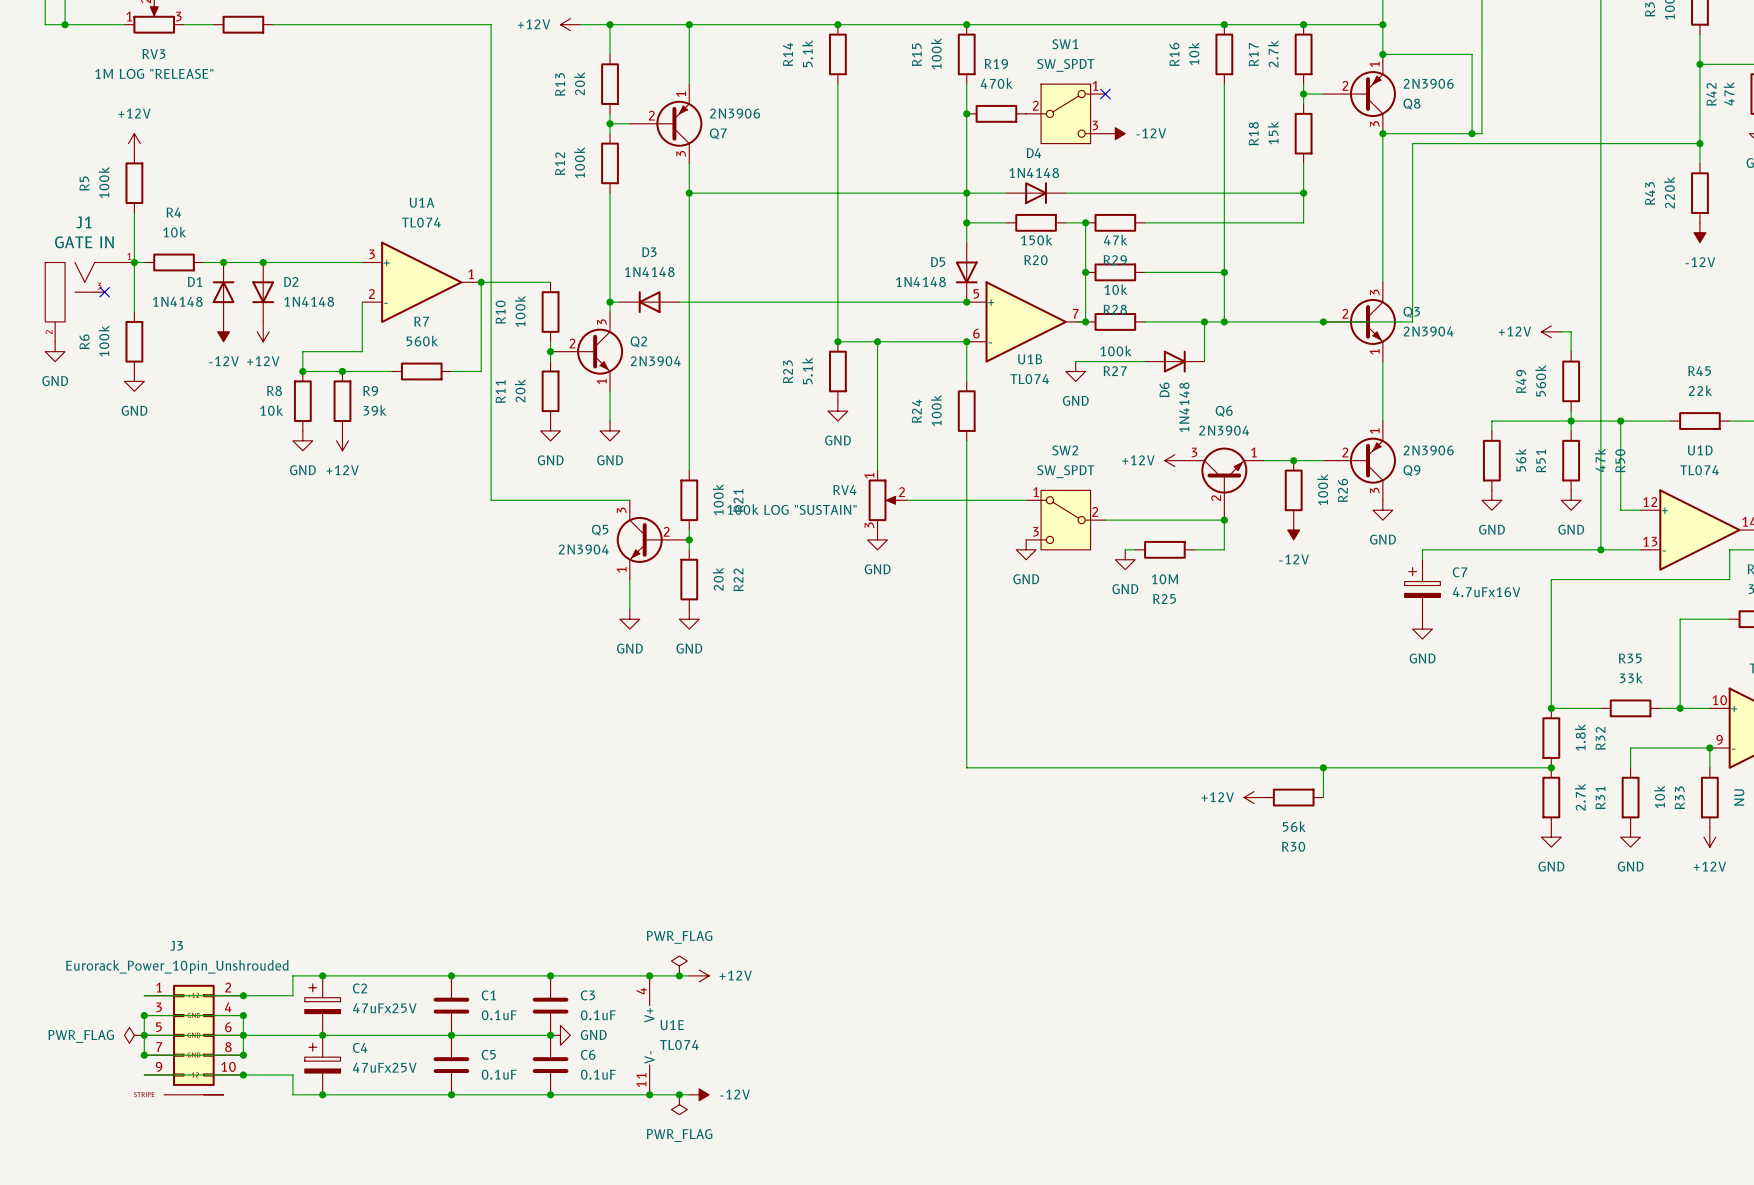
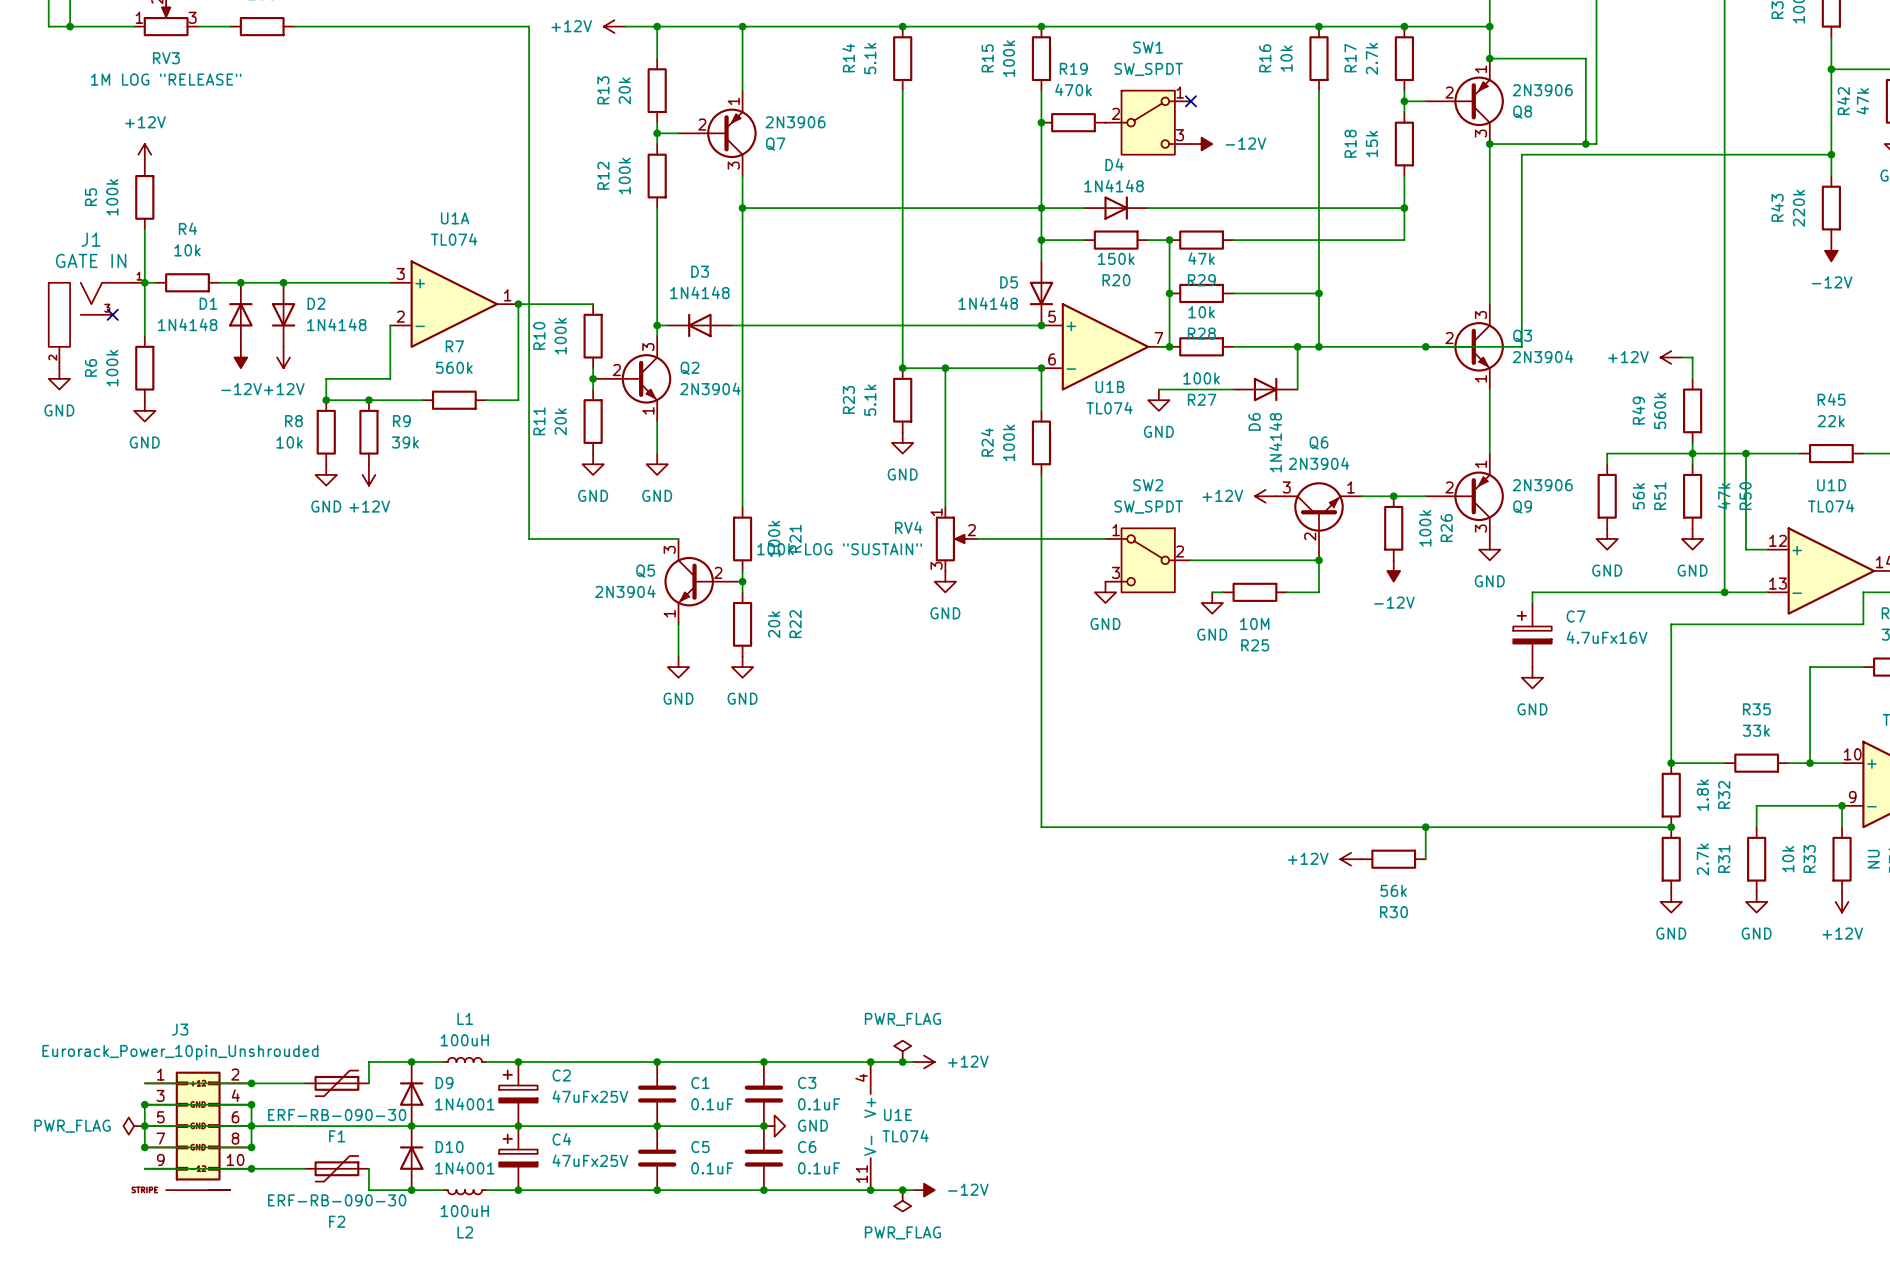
power symbol: PWR_FLAG (679, 966) -> none
junction: (322, 975) -> none
junction: (451, 975) -> none
junction: (550, 975) -> none
junction: (649, 975) -> none
junction: (679, 975) -> none
wire: (689, 975) (292, 975) (292, 995) (144, 995) -> none
power symbol position: +12V (699, 975) -> +12V (924, 1062)
power symbol: none -> PWR_FLAG (902, 1051)
L1: none -> 100uH (465, 1059)
junction: none -> (411, 1062)
wire: none -> (443, 1062) (368, 1062) (368, 1083)
wire: none -> (486, 1062) (913, 1062)
junction: none -> (518, 1062)
junction: none -> (657, 1062)
junction: none -> (763, 1062)
junction: none -> (870, 1062)
junction: none -> (902, 1062)
junction: (243, 995) -> none
wire: none -> (144, 1083) (304, 1083)
junction: none -> (251, 1083)
F1: none -> ERF-RB-090-30 (336, 1083)
C2 position: (322, 1005) -> (518, 1094)
C1 position: (451, 1005) -> (657, 1094)
C3 position: (550, 1005) -> (763, 1094)
wire: (144, 1015) (144, 1055) (243, 1055) (243, 1015) (144, 1015) -> (144, 1104) (144, 1147) (251, 1147) (251, 1104) (144, 1104)
junction: (144, 1015) -> none
junction: (243, 1015) -> none
D9: none -> 1N4001 (411, 1094)
junction: none -> (144, 1104)
junction: none -> (251, 1104)
power symbol position: PWR_FLAG (134, 1035) -> PWR_FLAG (134, 1126)
wire: (144, 1035) (550, 1035) -> none
junction: (144, 1035) -> none
junction: (243, 1035) -> none
junction: (322, 1035) -> none
junction: (451, 1035) -> none
junction: (550, 1035) -> none
power symbol position: GND (560, 1035) -> GND (774, 1126)
U1E position: (649, 1035) -> (870, 1126)
J3 position: (193, 1039) -> (198, 1130)
wire: none -> (144, 1126) (763, 1126)
junction: none -> (144, 1126)
junction: none -> (251, 1126)
junction: none -> (411, 1126)
junction: none -> (518, 1126)
junction: none -> (657, 1126)
junction: none -> (763, 1126)
junction: (144, 1055) -> none
junction: (243, 1055) -> none
junction: none -> (144, 1147)
junction: none -> (251, 1147)
C4 position: (322, 1065) -> (518, 1158)
C5 position: (451, 1065) -> (657, 1158)
C6 position: (550, 1065) -> (763, 1158)
wire: (144, 1074) (292, 1074) (292, 1094) (689, 1094) -> none
junction: (243, 1074) -> none
D10: none -> 1N4001 (411, 1158)
wire: none -> (144, 1168) (304, 1168)
junction: none -> (251, 1168)
F2: none -> ERF-RB-090-30 (336, 1168)
wire: none -> (368, 1168) (368, 1190) (443, 1190)
junction: (322, 1094) -> none
junction: (451, 1094) -> none
junction: (550, 1094) -> none
junction: (649, 1094) -> none
junction: (679, 1094) -> none
power symbol position: -12V (699, 1094) -> -12V (924, 1190)
junction: none -> (411, 1190)
wire: none -> (486, 1190) (913, 1190)
junction: none -> (518, 1190)
junction: none -> (657, 1190)
power symbol: PWR_FLAG (679, 1104) -> none
junction: none -> (763, 1190)
junction: none -> (870, 1190)
junction: none -> (902, 1190)
L2: none -> 100uH (465, 1192)
power symbol: none -> PWR_FLAG (902, 1200)

